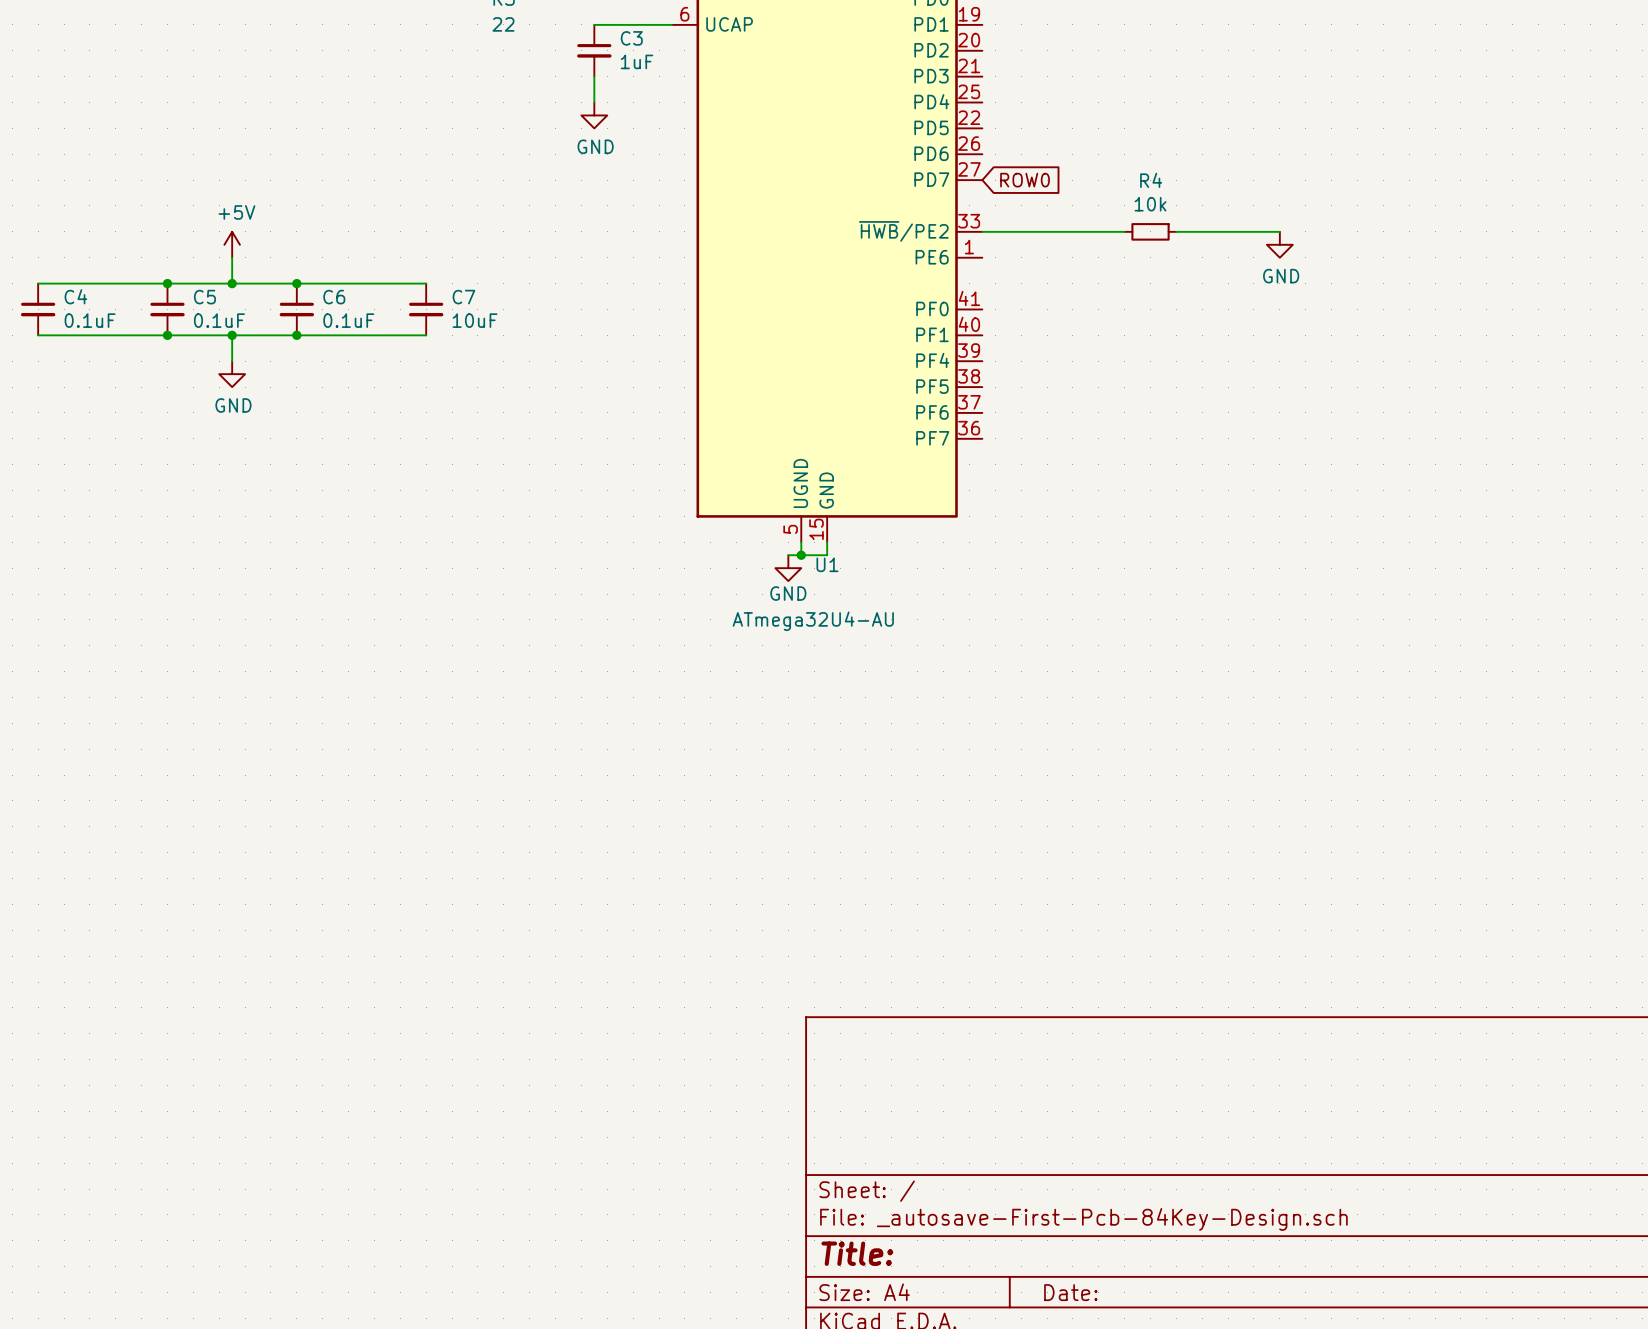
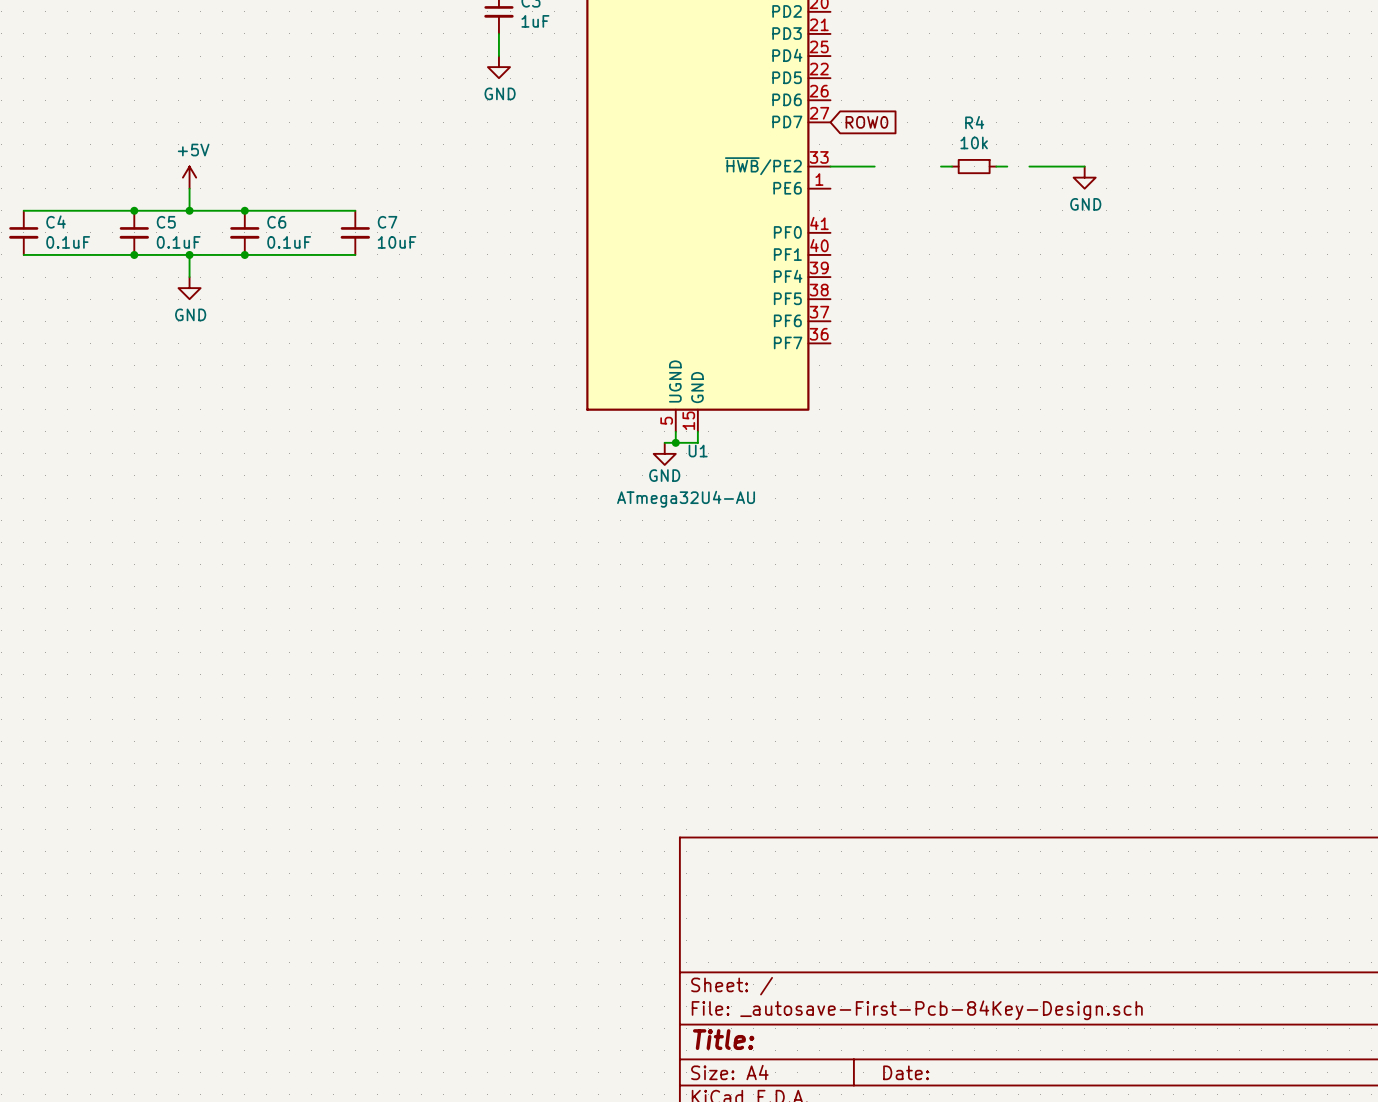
wire: (1034, 231) (1111, 231) -> none
wire: (1189, 231) (1215, 231) -> none

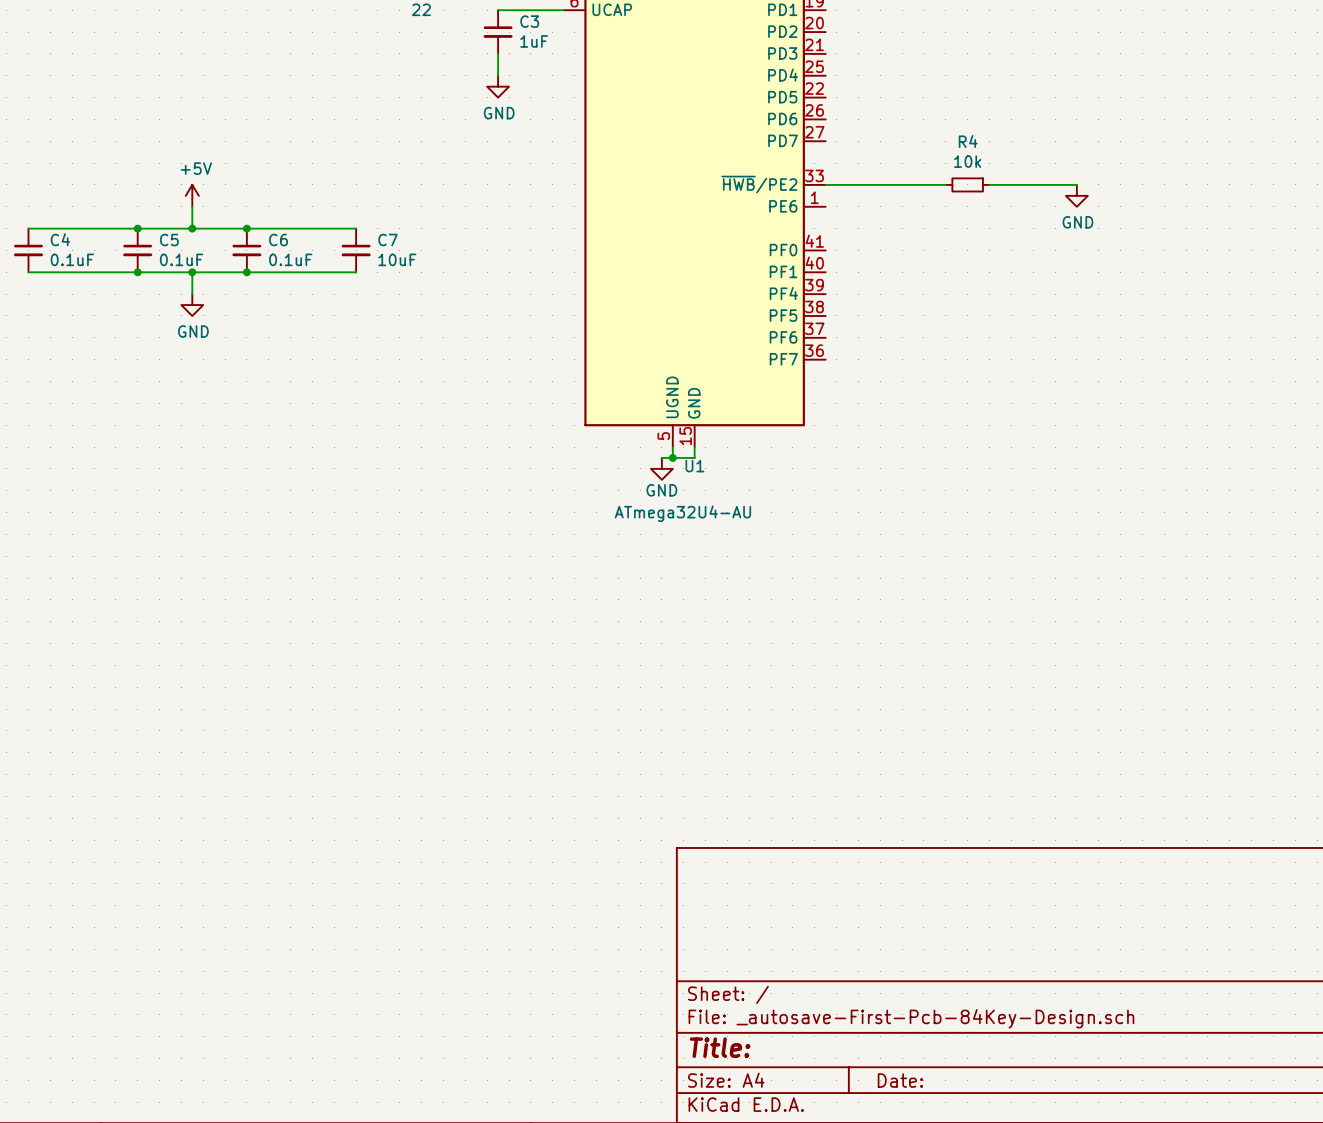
global label: ROW0 (866, 122) -> none
wire: none -> (869, 184) (934, 184)
wire: none -> (1000, 184) (1022, 184)

